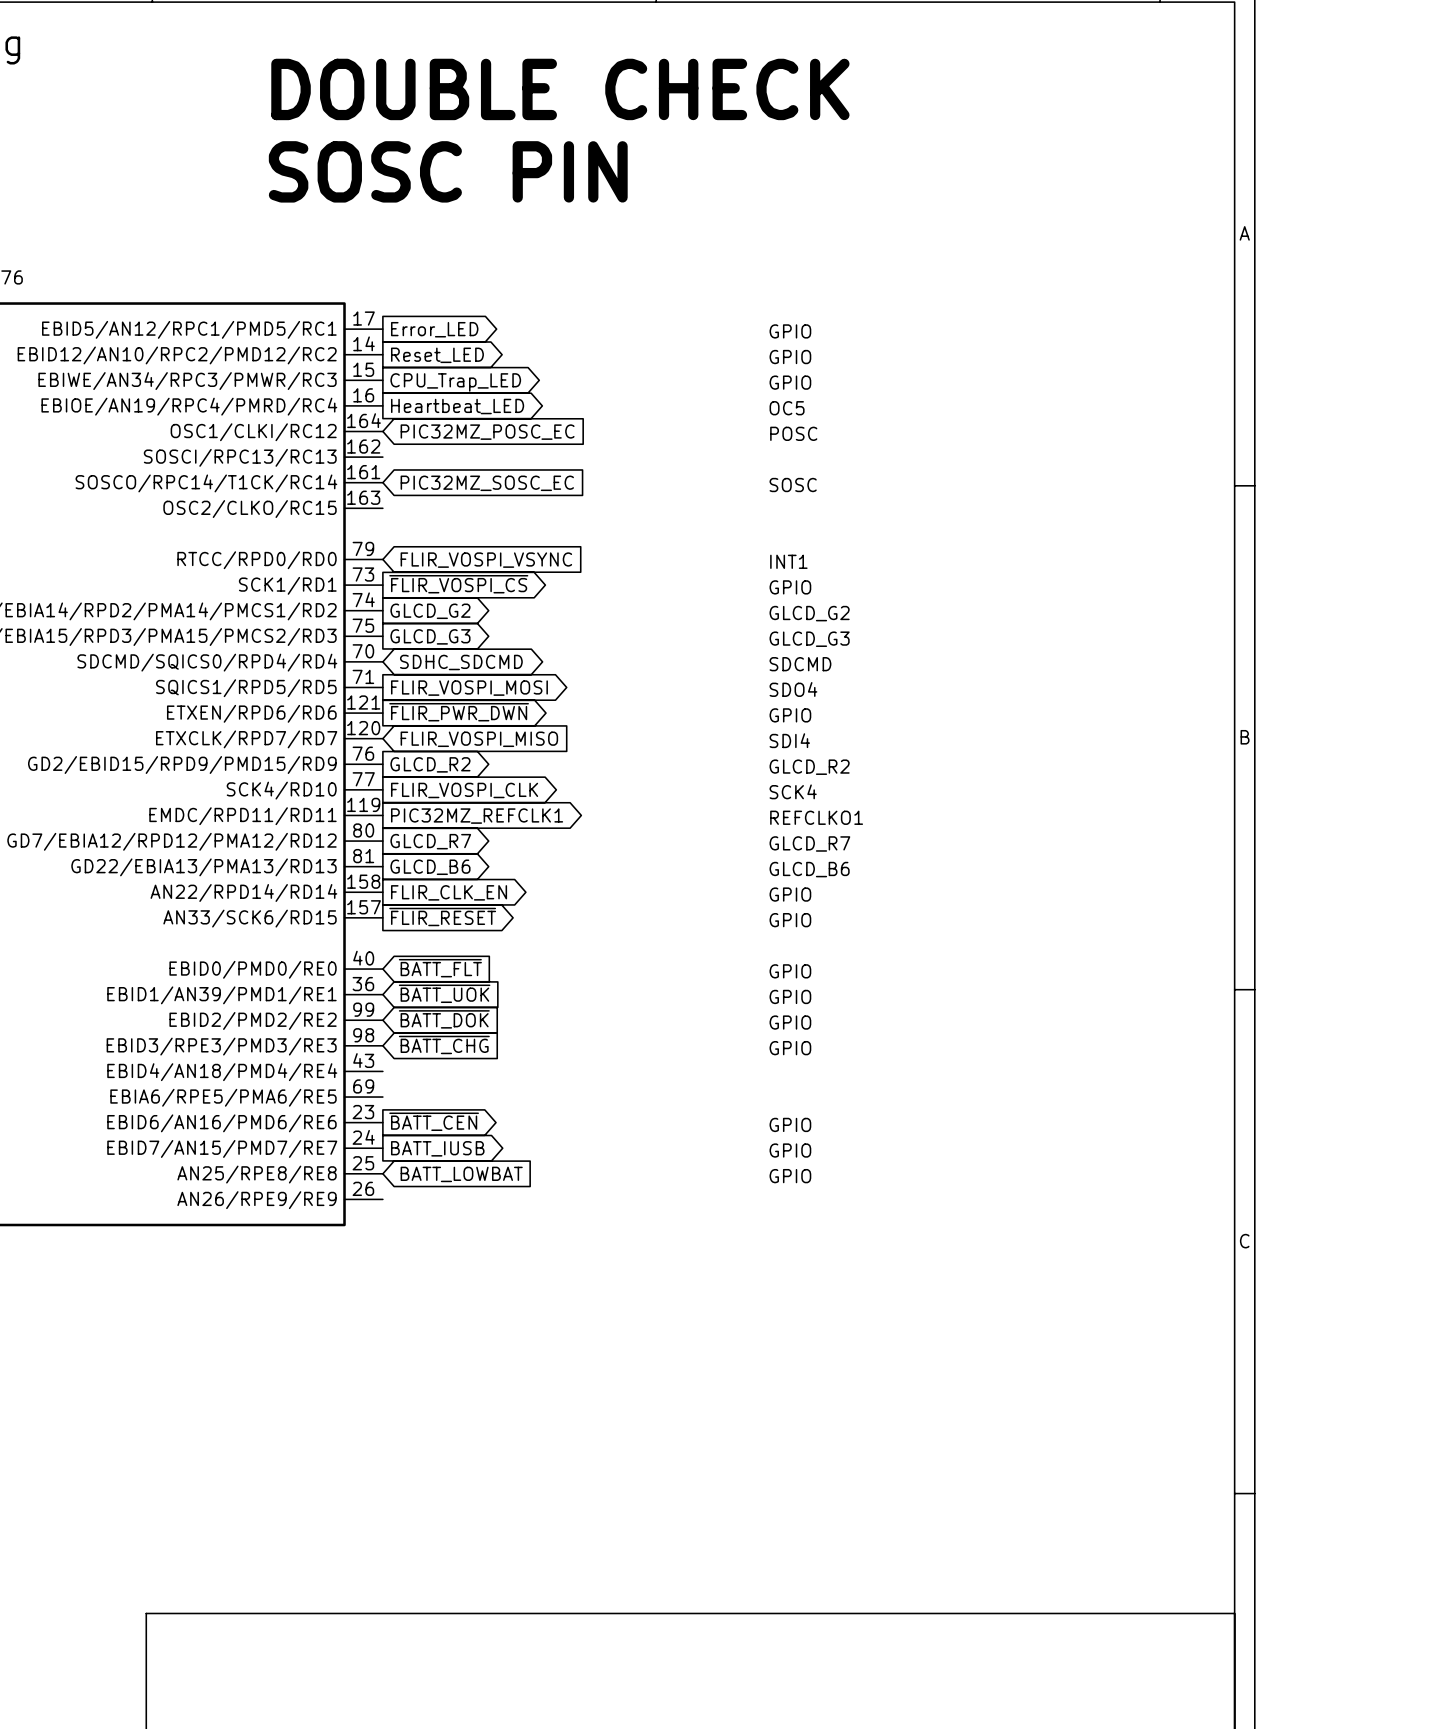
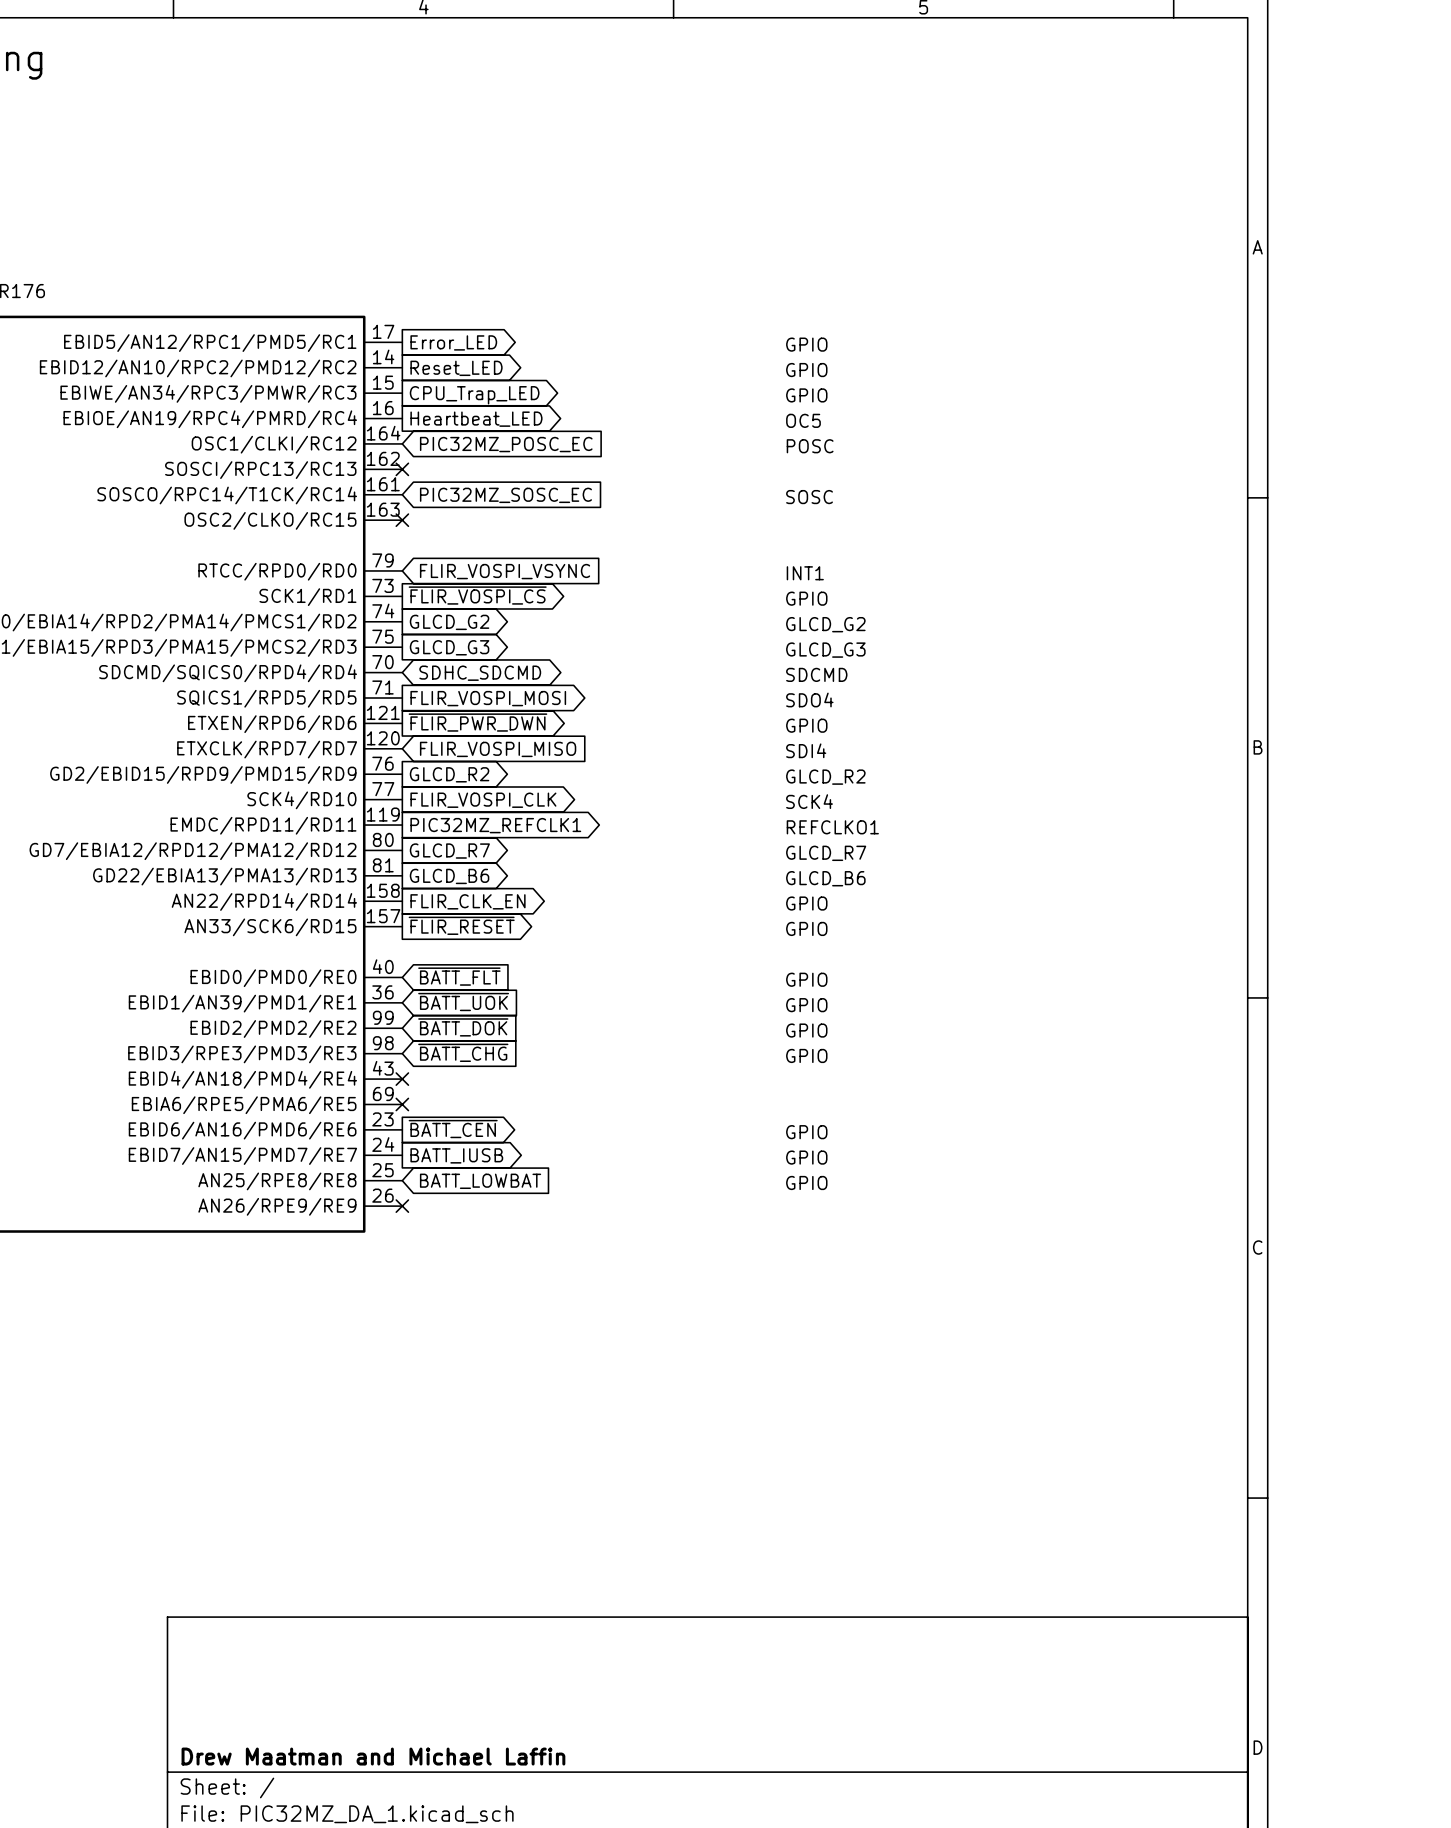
text: DOUBLE CHECK (560, 89) -> none
text: SOSC PIN (448, 171) -> none
no-connect mark: none -> (402, 469)
no-connect mark: none -> (402, 520)
no-connect mark: none -> (402, 1079)
no-connect mark: none -> (402, 1104)
no-connect mark: none -> (402, 1206)

